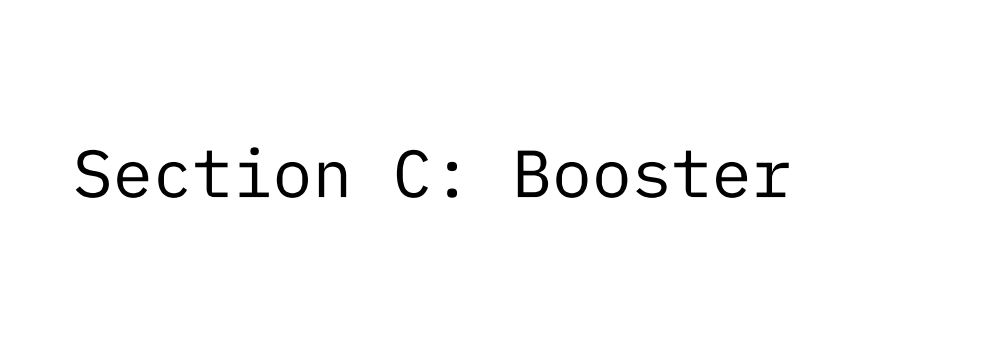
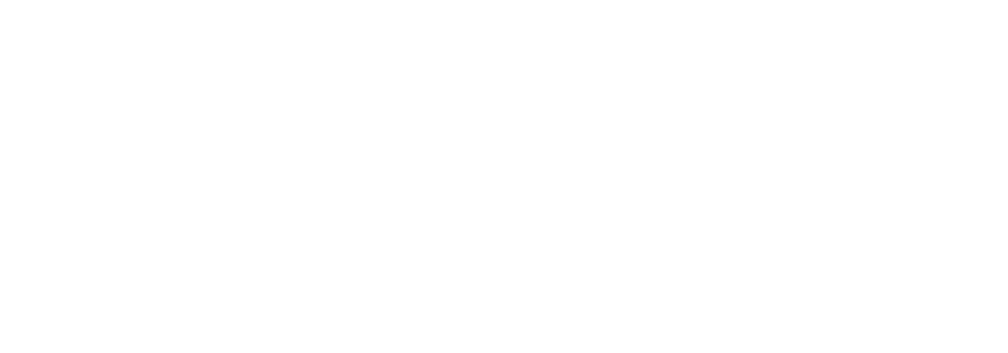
text: Section C: Booster (432, 172) -> none

